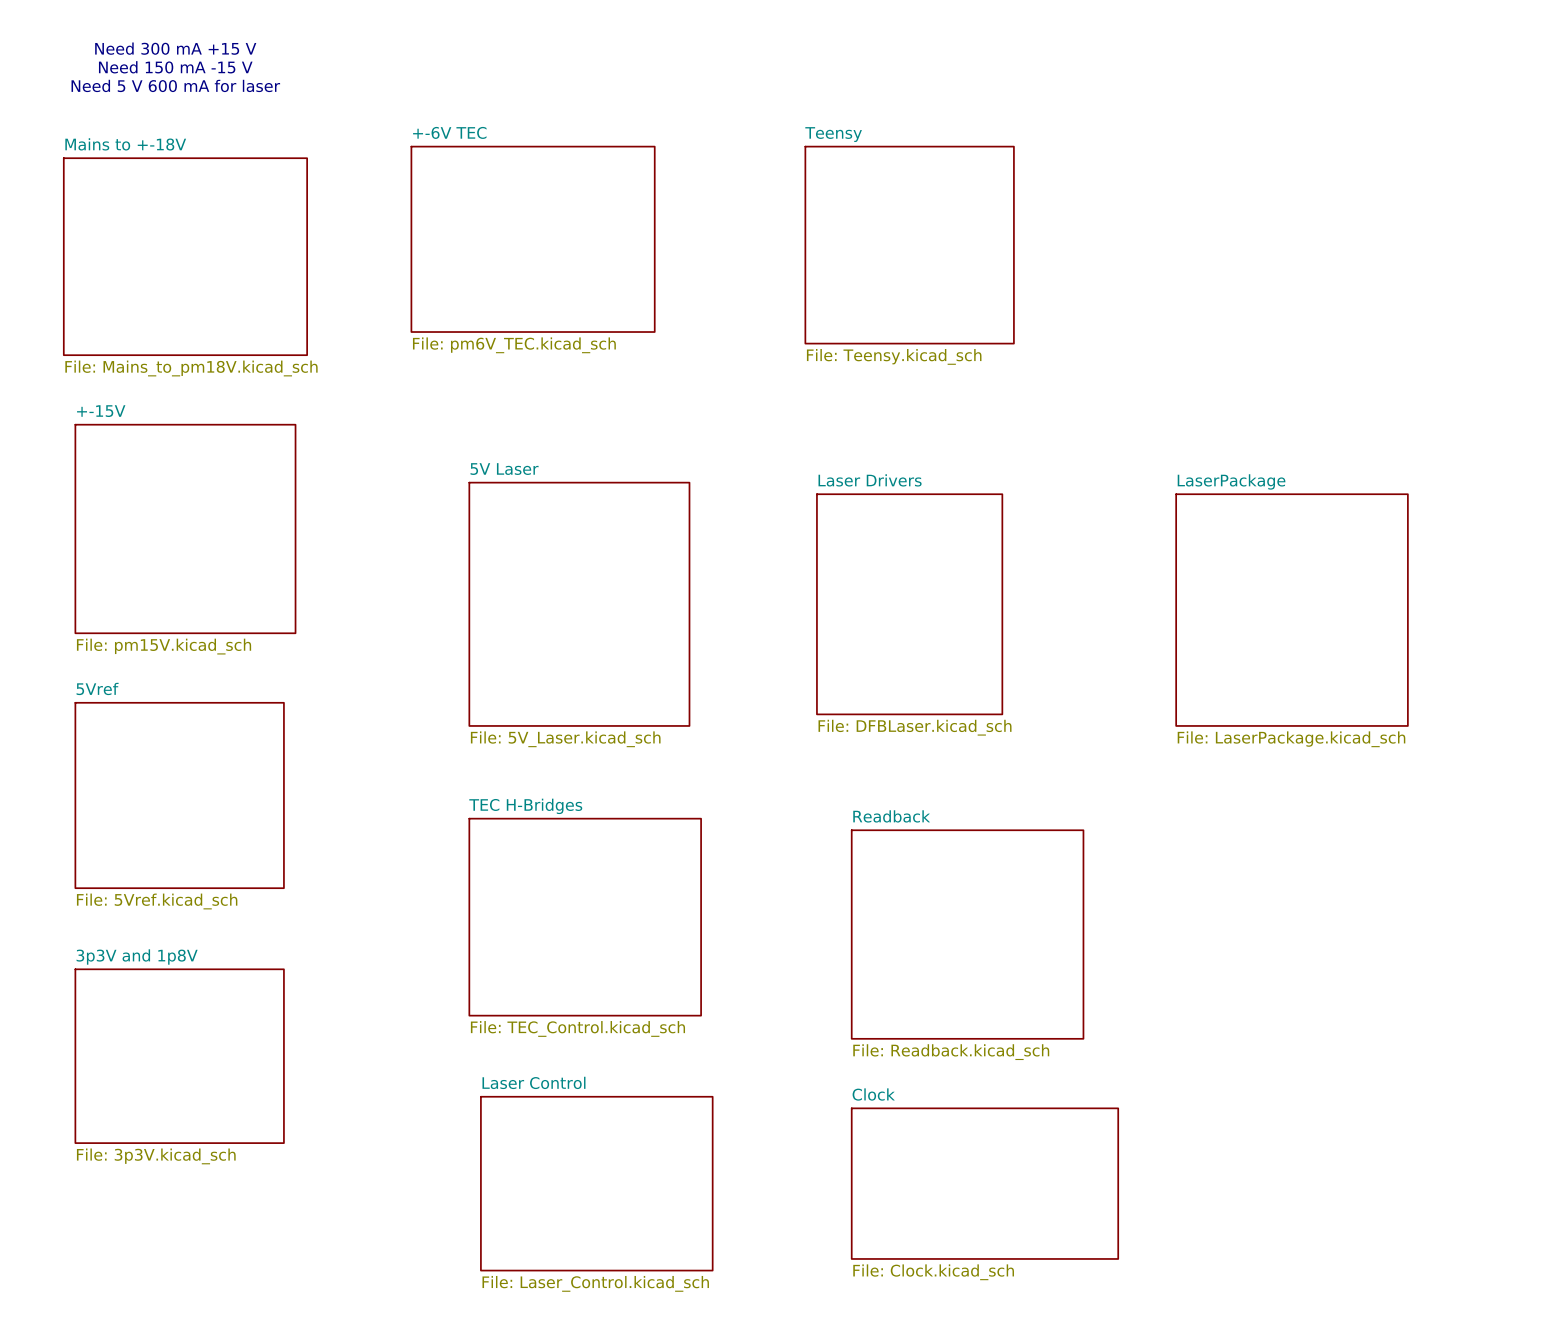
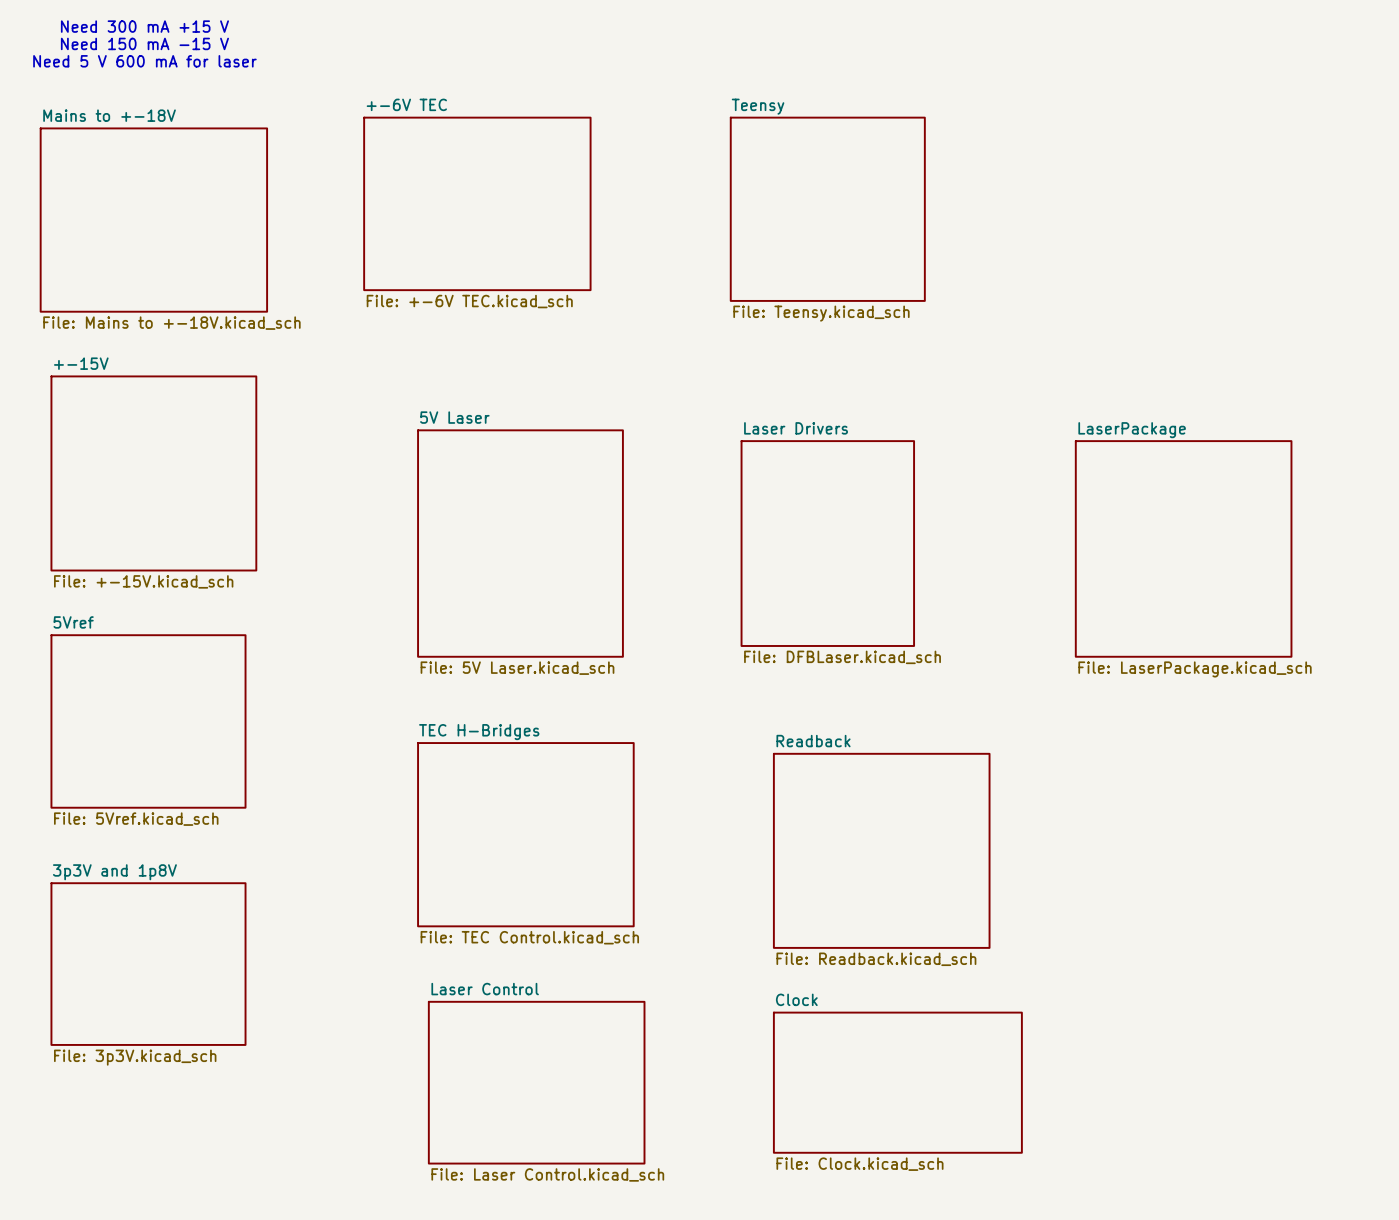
sheet +-6V TEC value: File: pm6V_TEC.kicad_sch (514, 345) -> File: +-6V TEC.kicad_sch (469, 301)
sheet Mains to +-18V value: File: Mains_to_pm18V.kicad_sch (191, 368) -> File: Mains to +-18V.kicad_sch (171, 323)
sheet +-15V value: File: pm15V.kicad_sch (164, 646) -> File: +-15V.kicad_sch (143, 581)
sheet 5V Laser value: File: 5V_Laser.kicad_sch (565, 739) -> File: 5V Laser.kicad_sch (517, 668)
sheet TEC H-Bridges value: File: TEC_Control.kicad_sch (577, 1028) -> File: TEC Control.kicad_sch (529, 937)
sheet Laser Control value: File: Laser_Control.kicad_sch (595, 1283) -> File: Laser Control.kicad_sch (547, 1174)

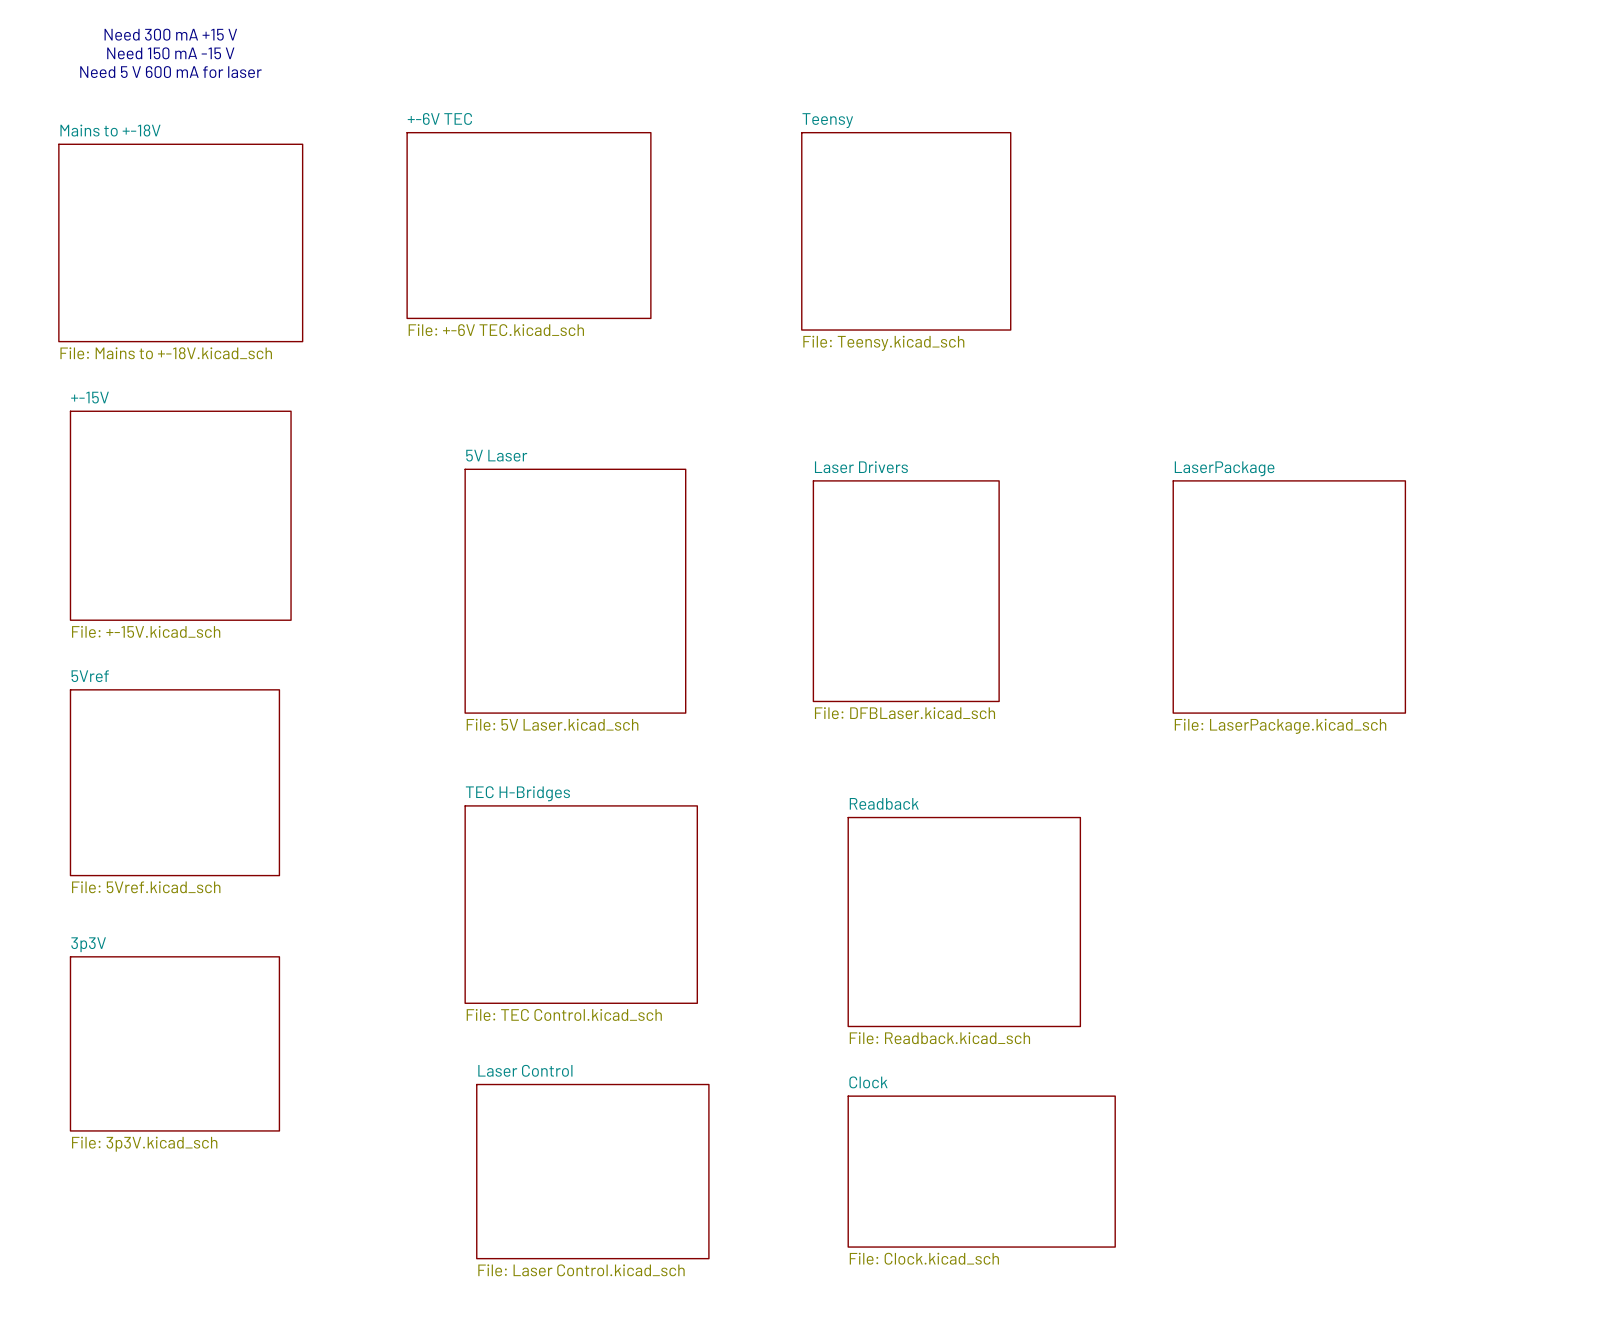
sheet 3p3V and 1p8V name: 3p3V and 1p8V (114, 872) -> 3p3V (88, 944)

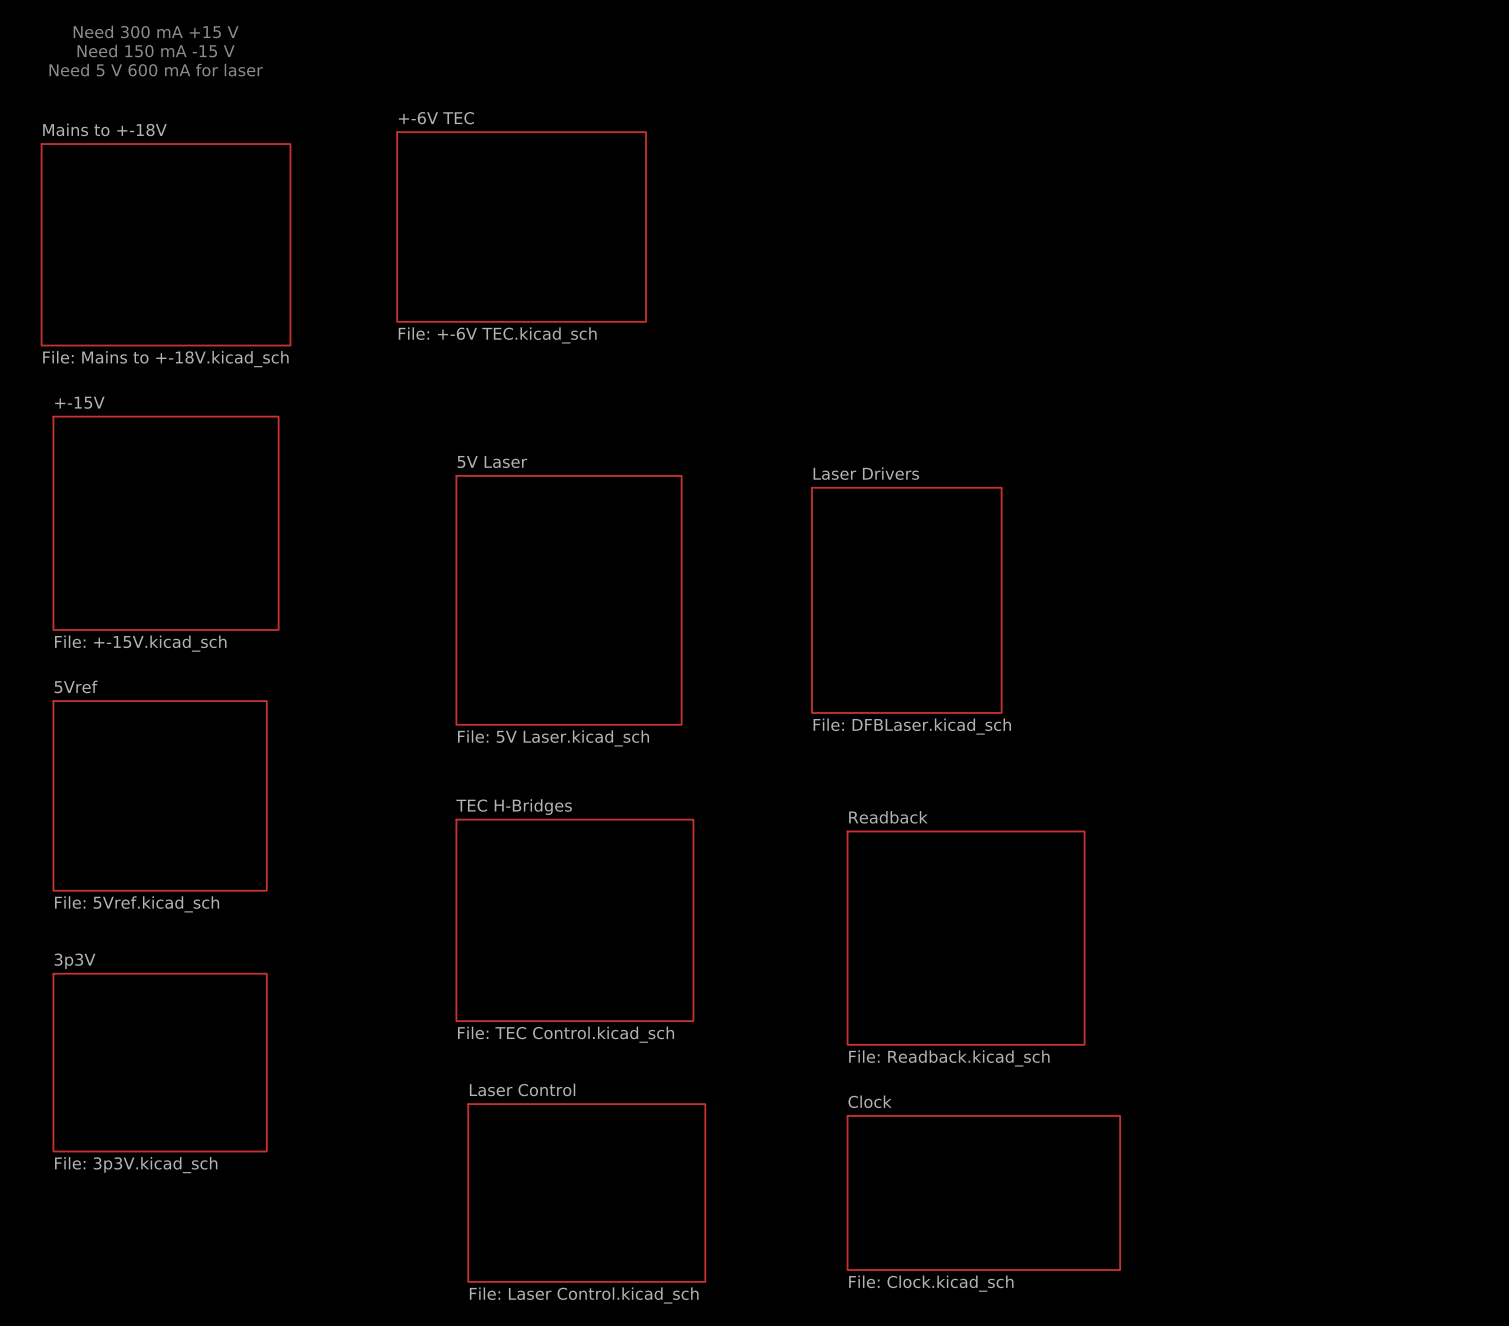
sheet Teensy: File: Teensy.kicad_sch (906, 231) -> none
sheet LaserPackage: File: LaserPackage.kicad_sch (1289, 596) -> none

